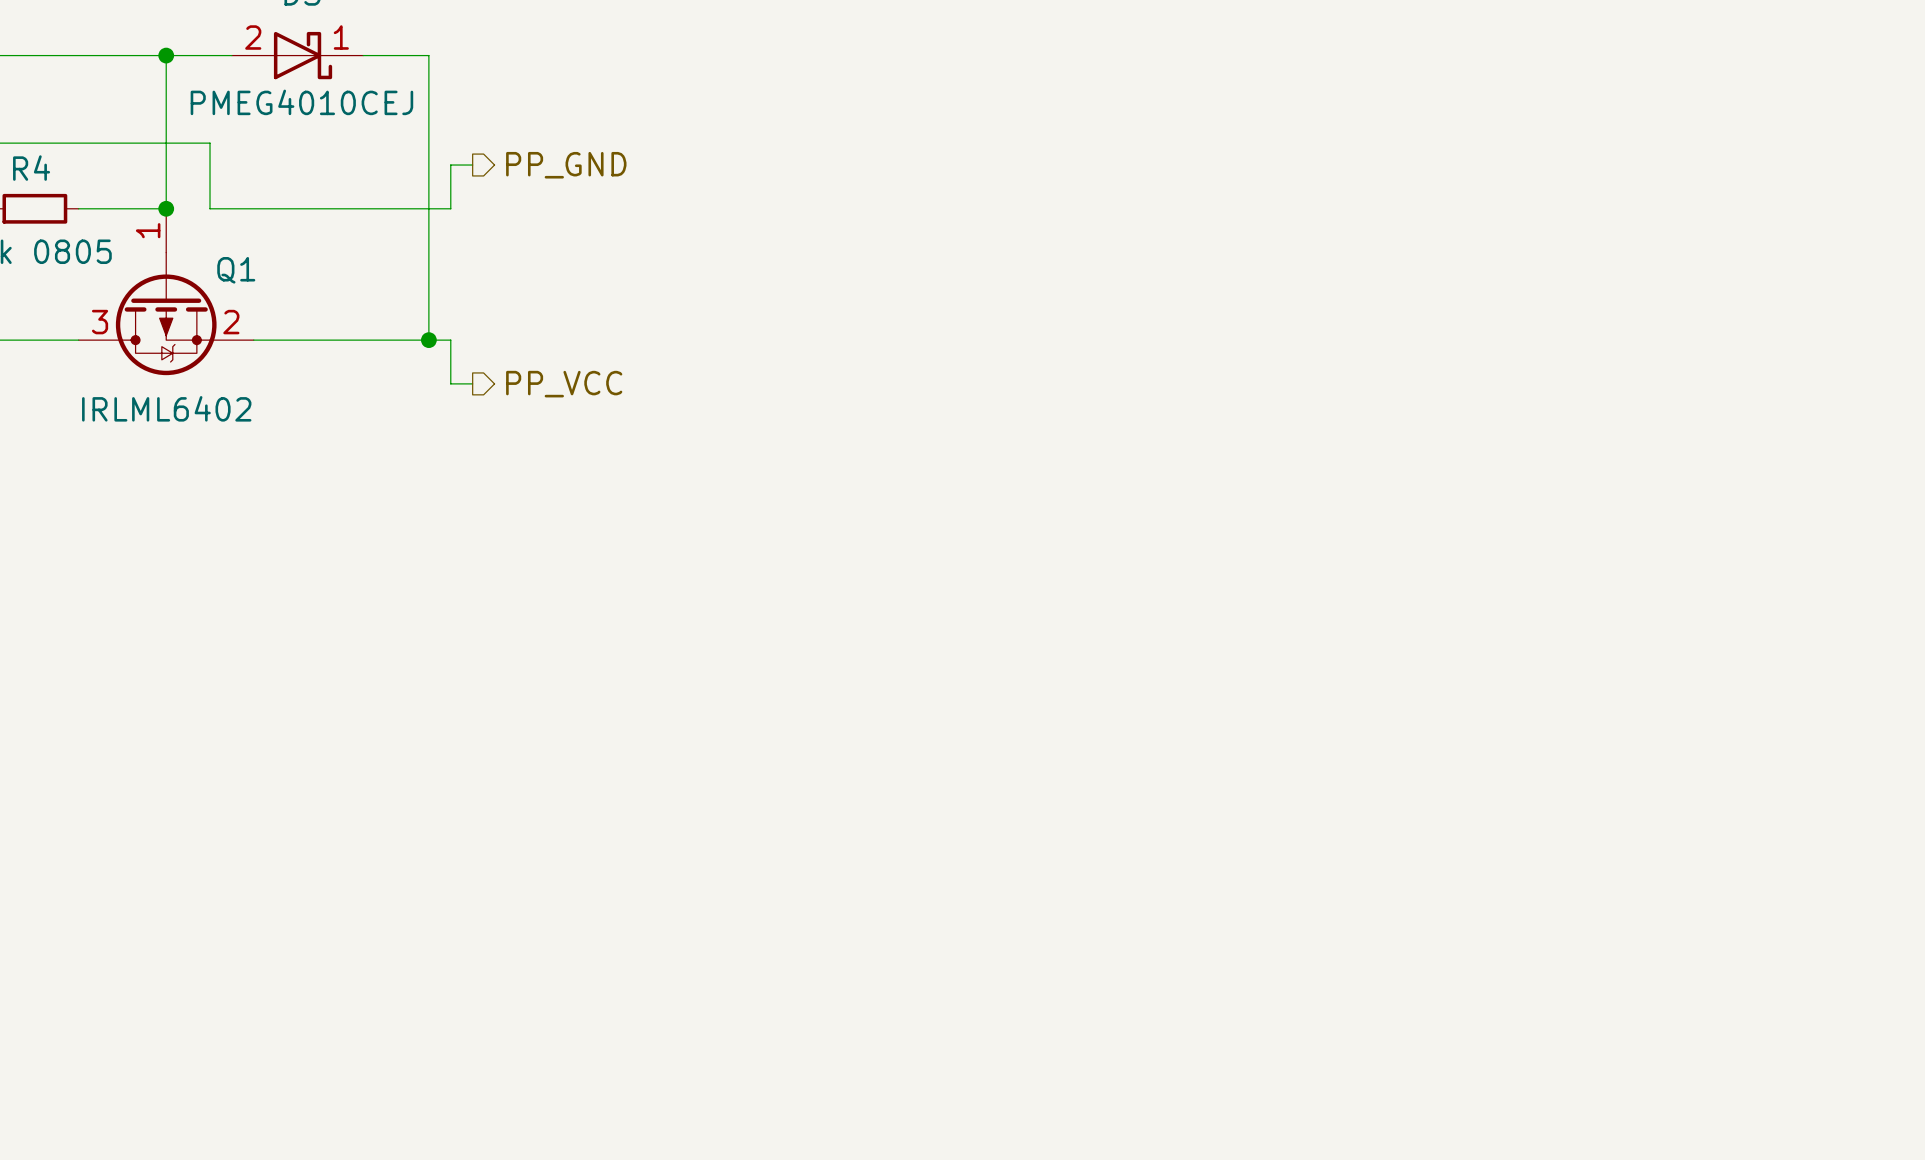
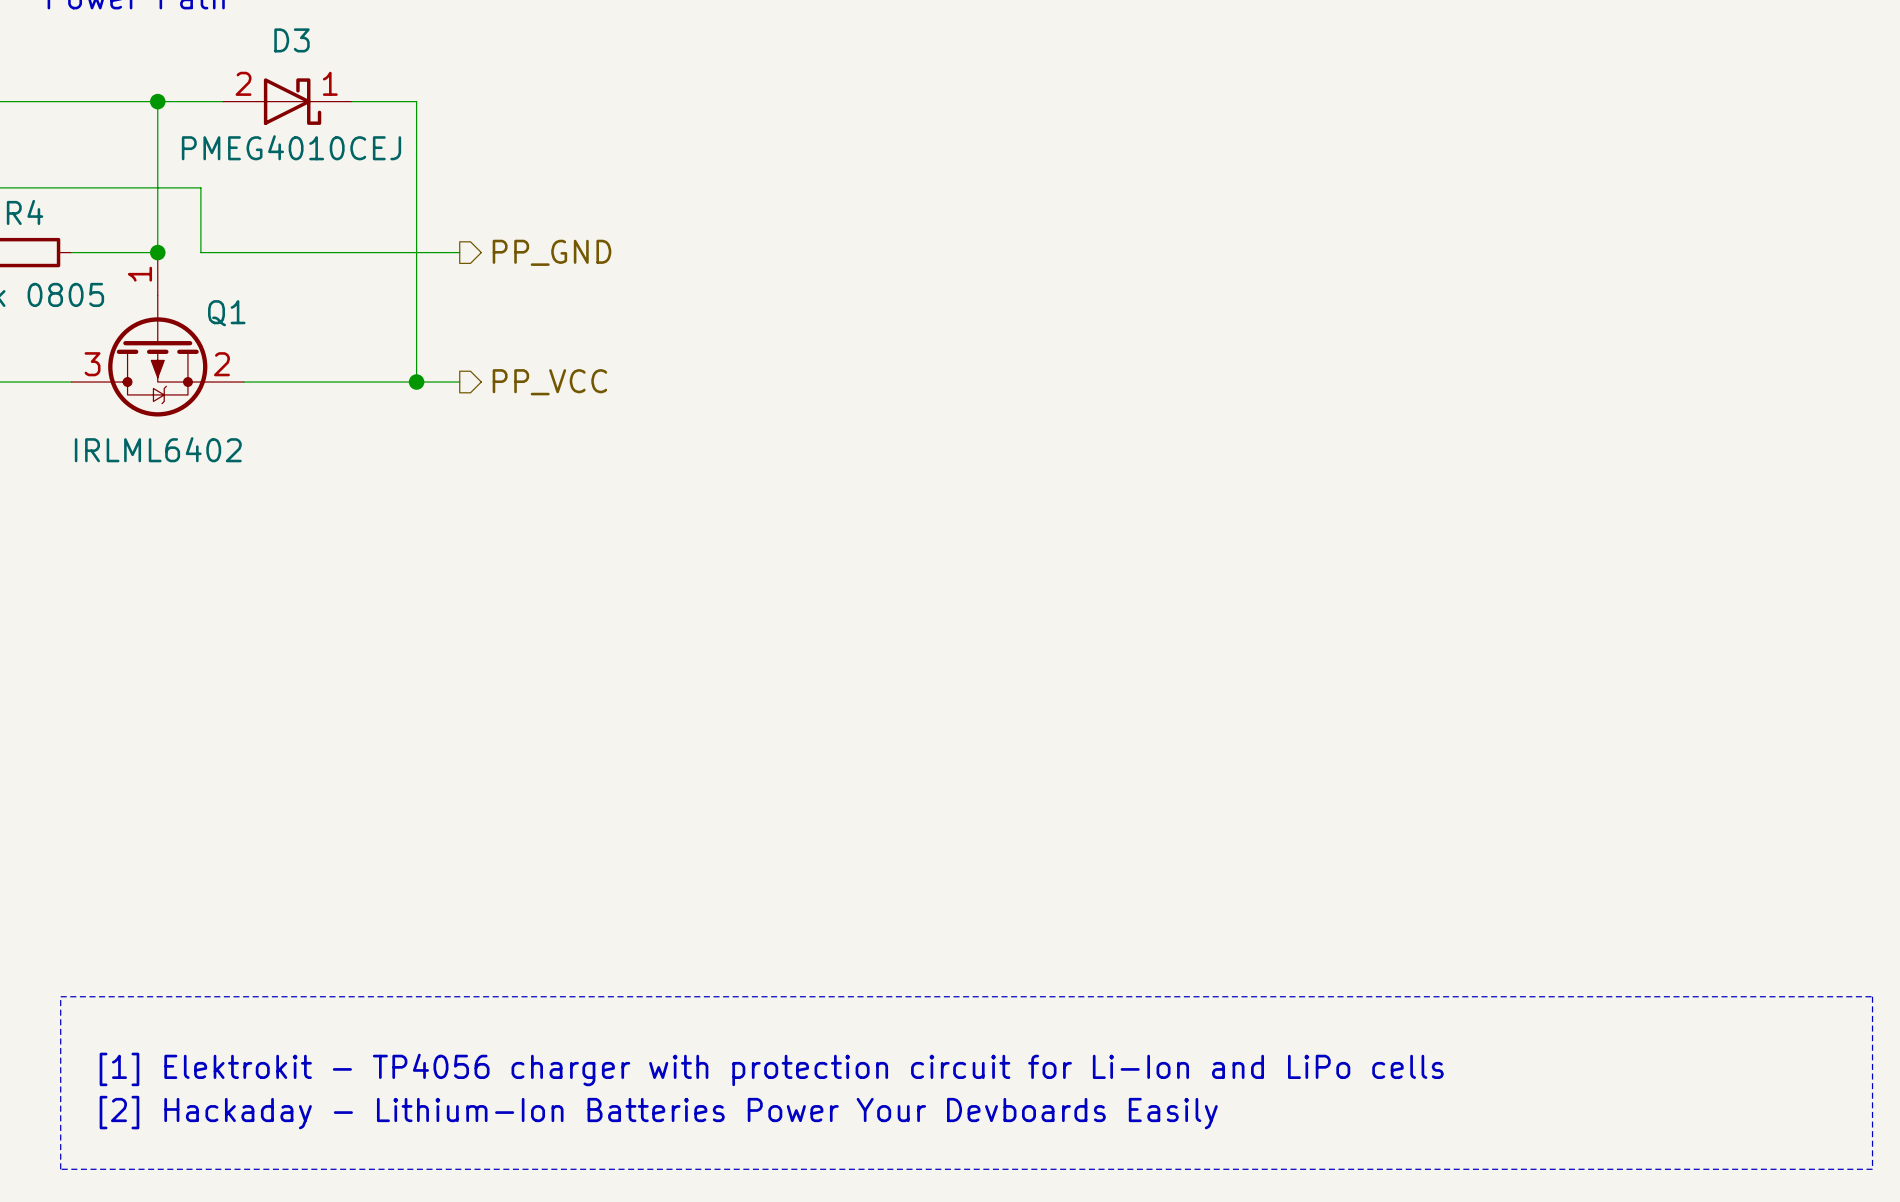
wire: (472, 165) (450, 165) (450, 208) -> (459, 252) (438, 252)
hierarchical label position: PP_GND (566, 165) -> PP_GND (551, 252)
wire: (450, 340) (450, 383) (472, 383) -> (438, 382) (459, 382)
hierarchical label position: PP_VCC (564, 384) -> PP_VCC (549, 382)
line: none -> (60, 996) (1872, 996) (1872, 1169) (60, 1169) (60, 996)
text: none -> [1] Elektrokit - TP4056 charger with protection circuit for Li-Ion and LiPo cells (771, 1069)
text: none -> [2] Hackaday - Lithium-Ion Batteries Power Your Devboards Easily (658, 1112)

